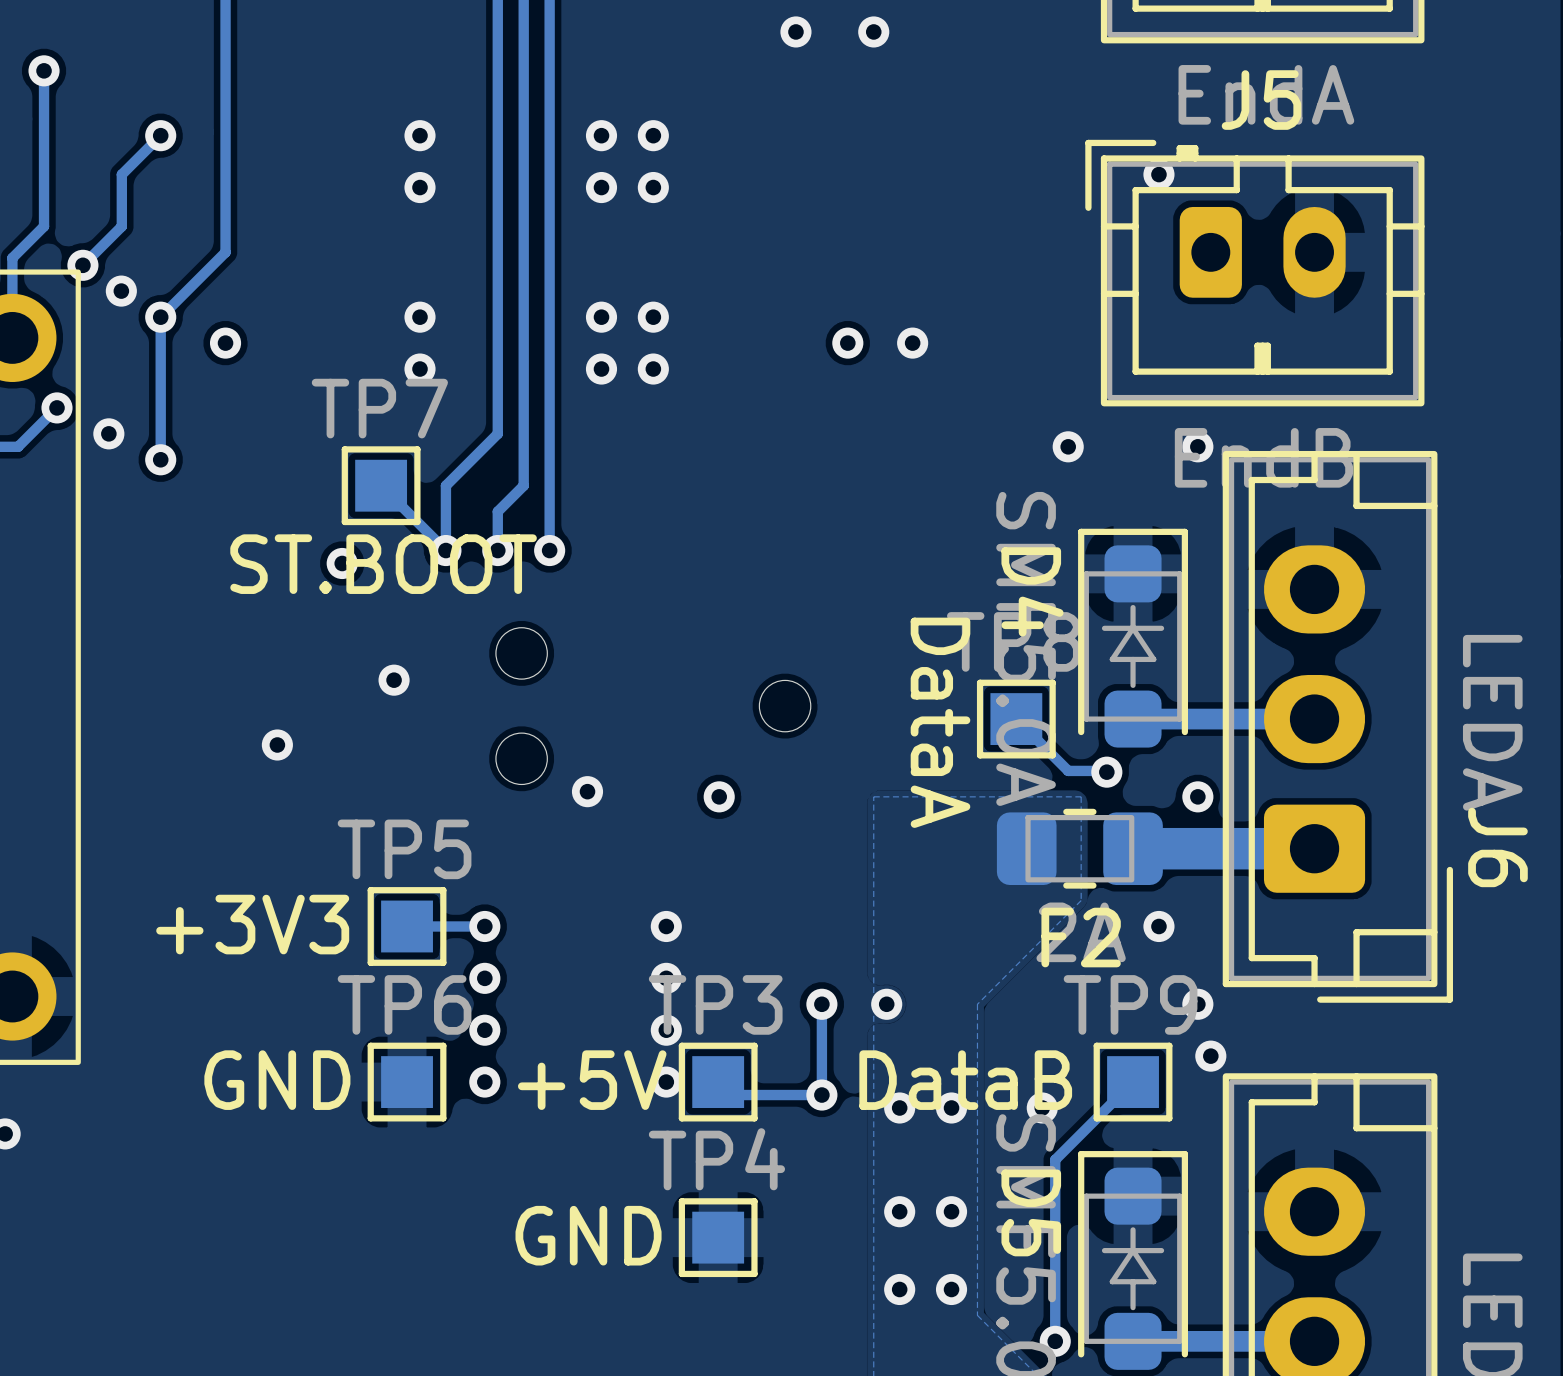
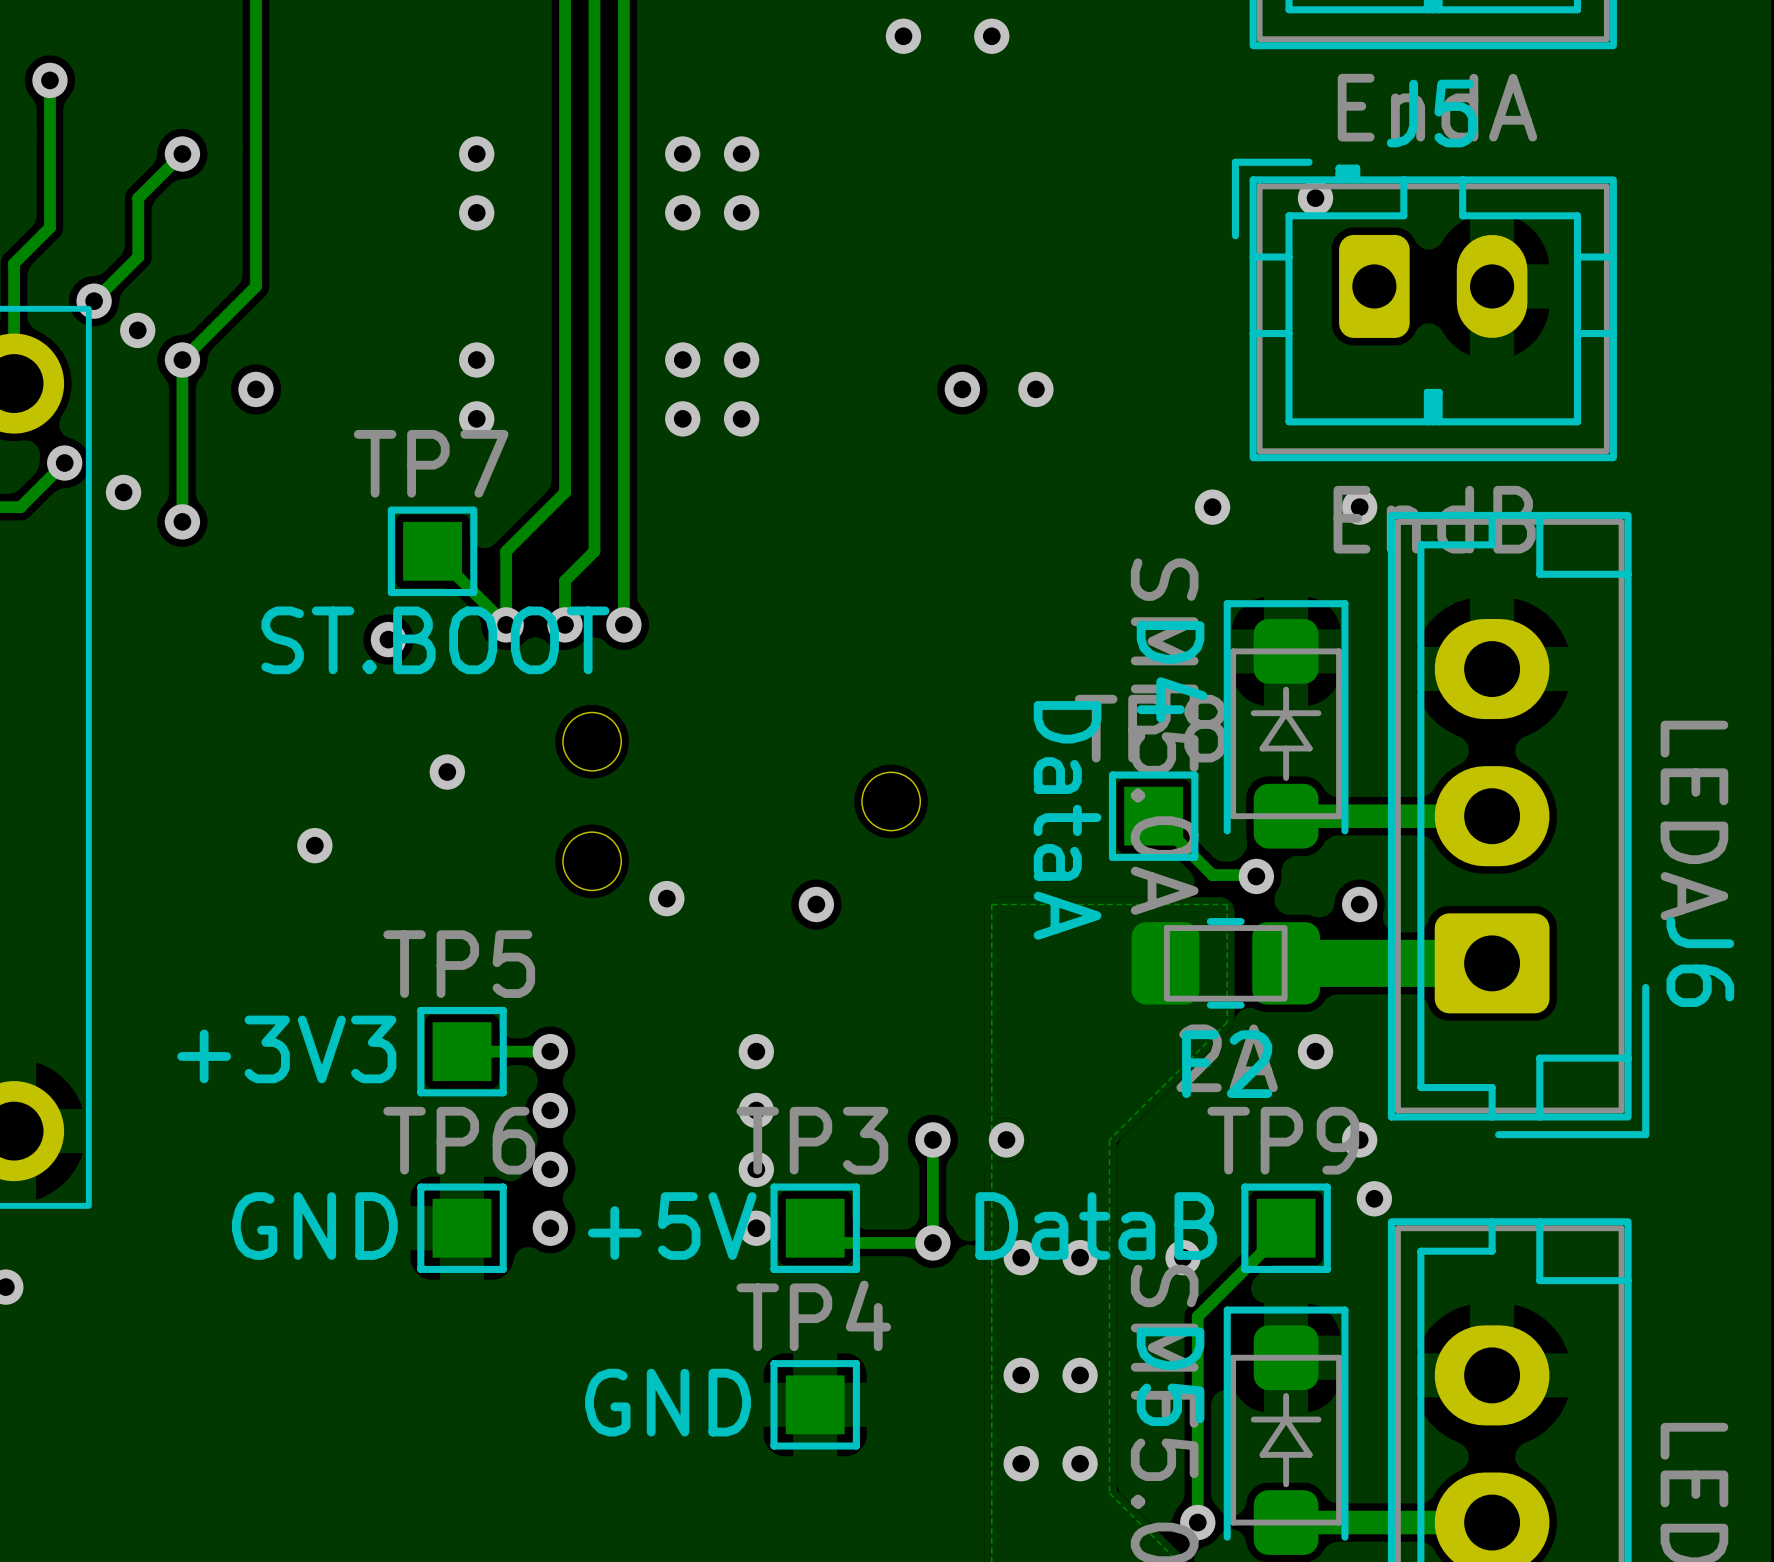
track: (44, 200) (44, 226) (12, 258) -> (49, 227) (14, 263) (14, 292)

